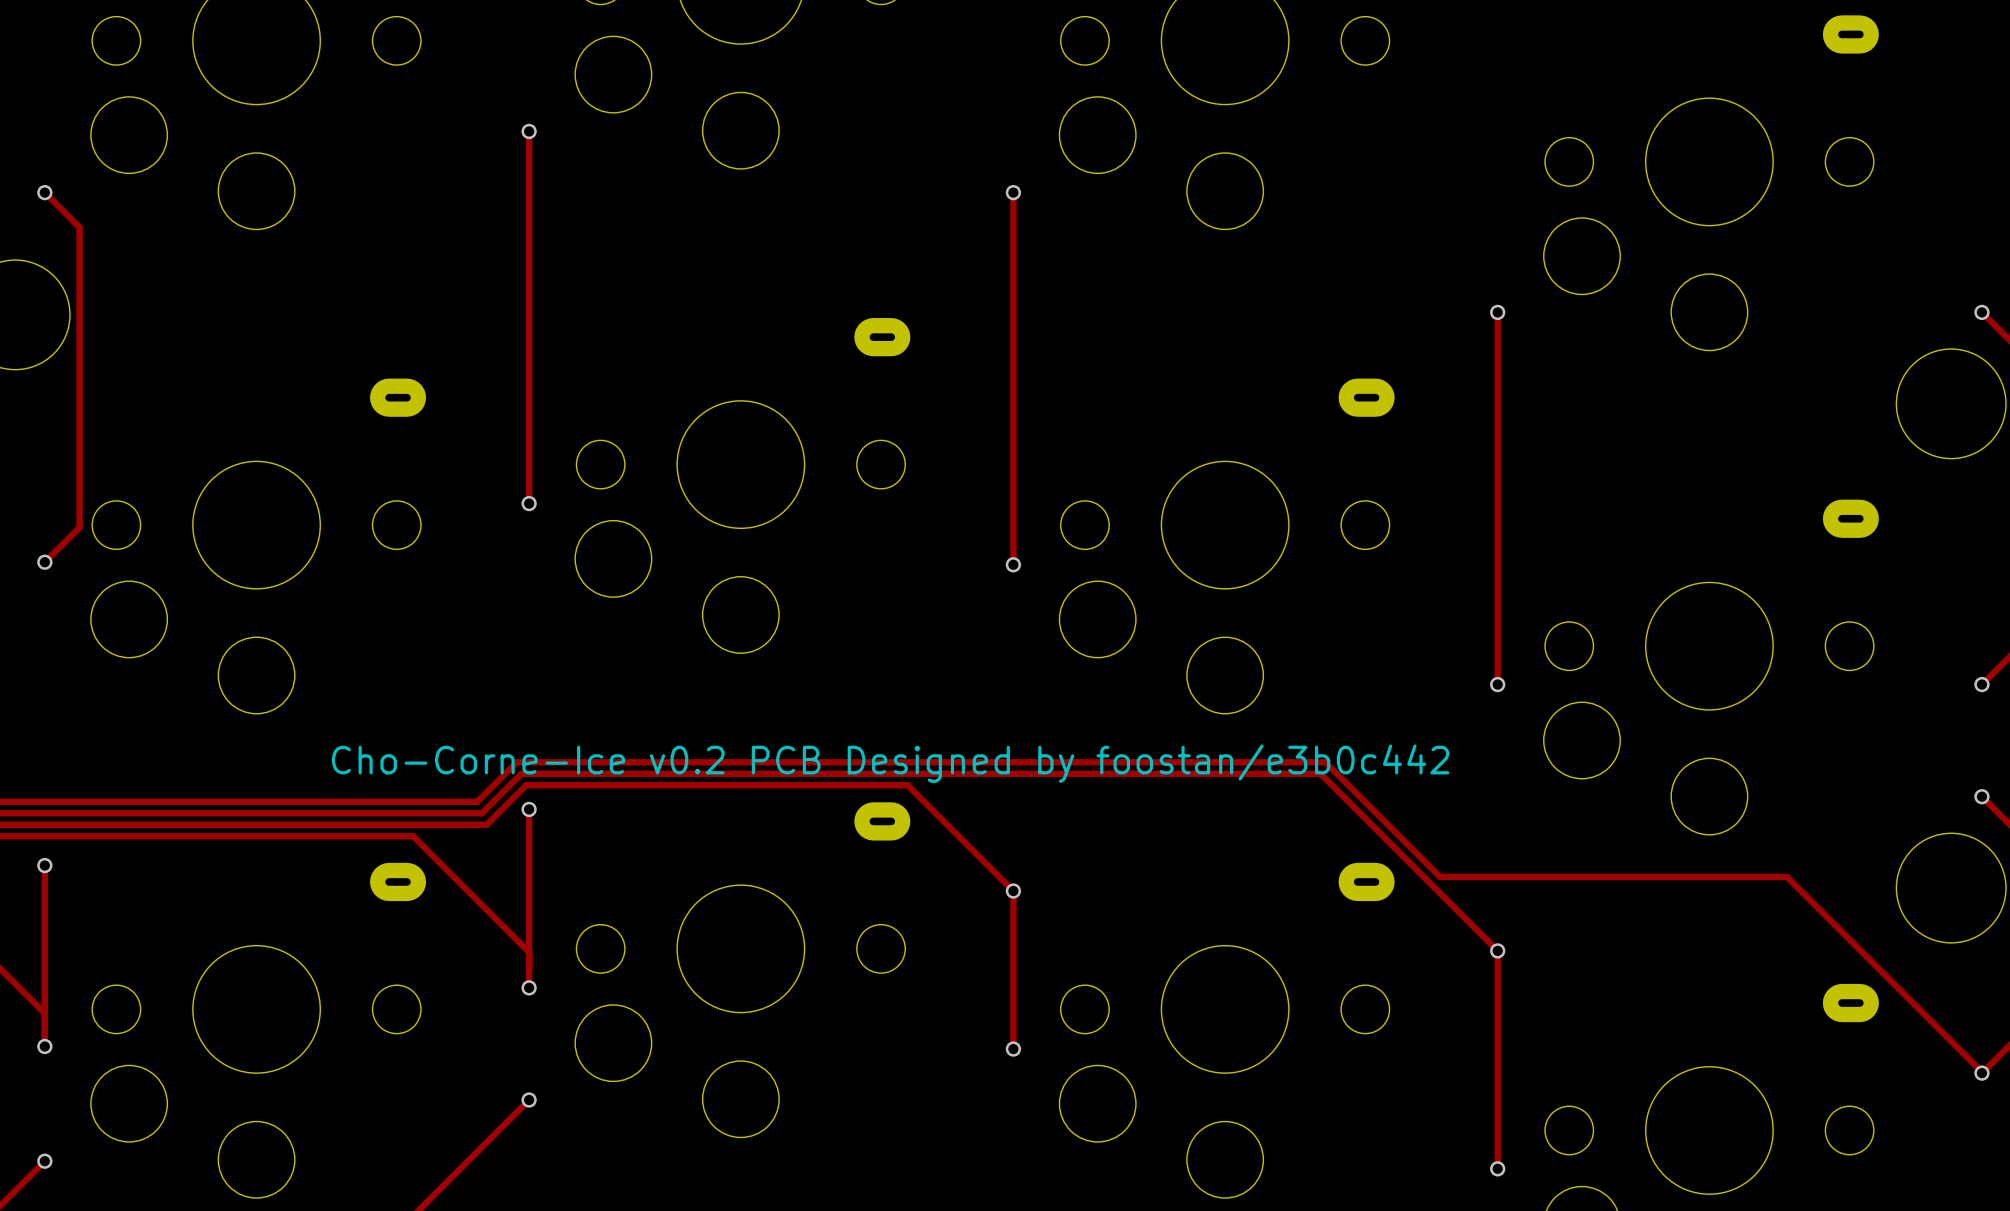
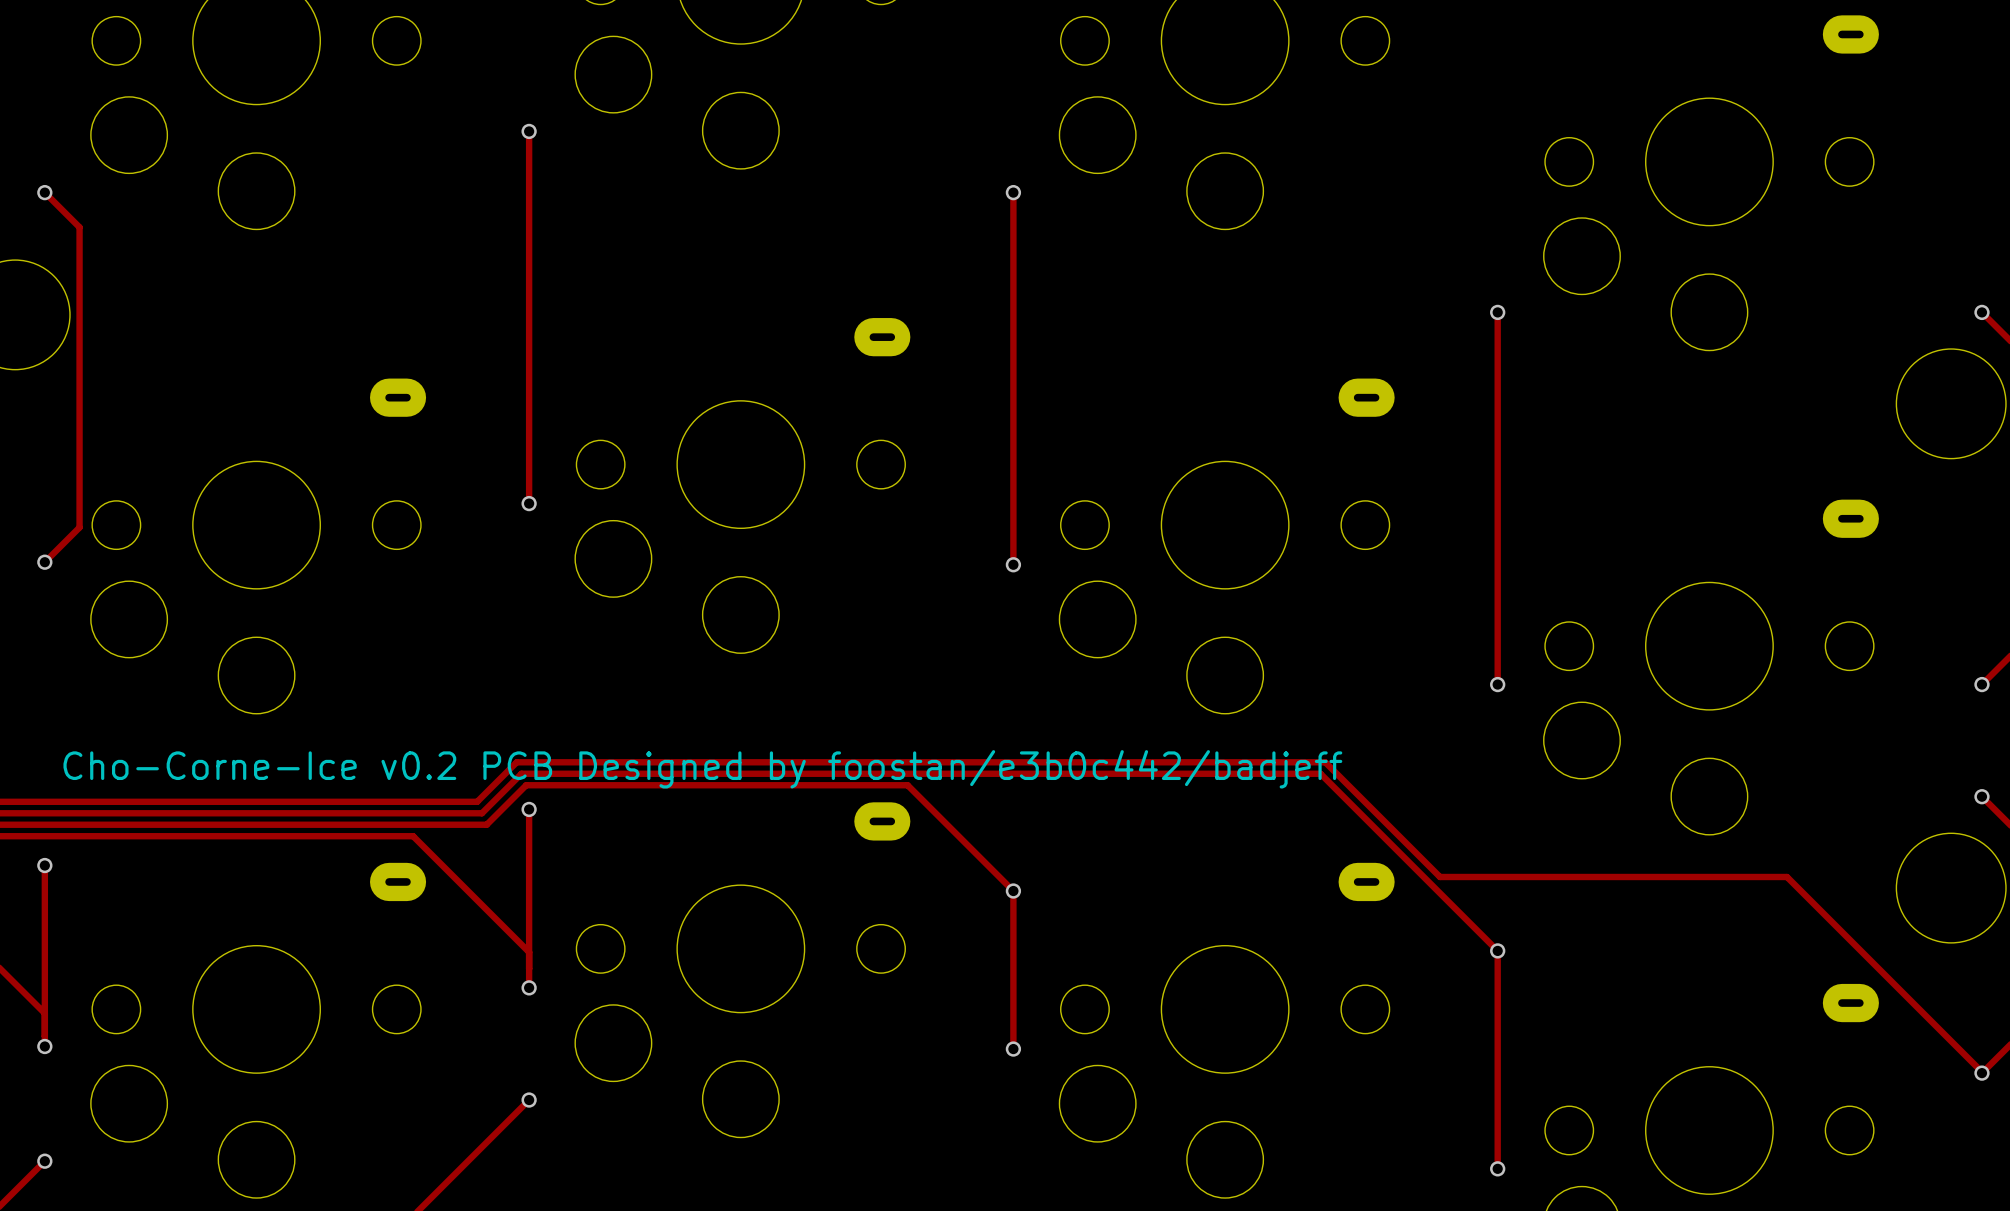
text: Cho-Corne-Ice v0.2 PCB Designed by foostan/e3b0c442 (890, 763) -> Cho-Corne-Ice v0.2 PCB Designed by foostan/e3b0c442/badjeff (702, 769)

